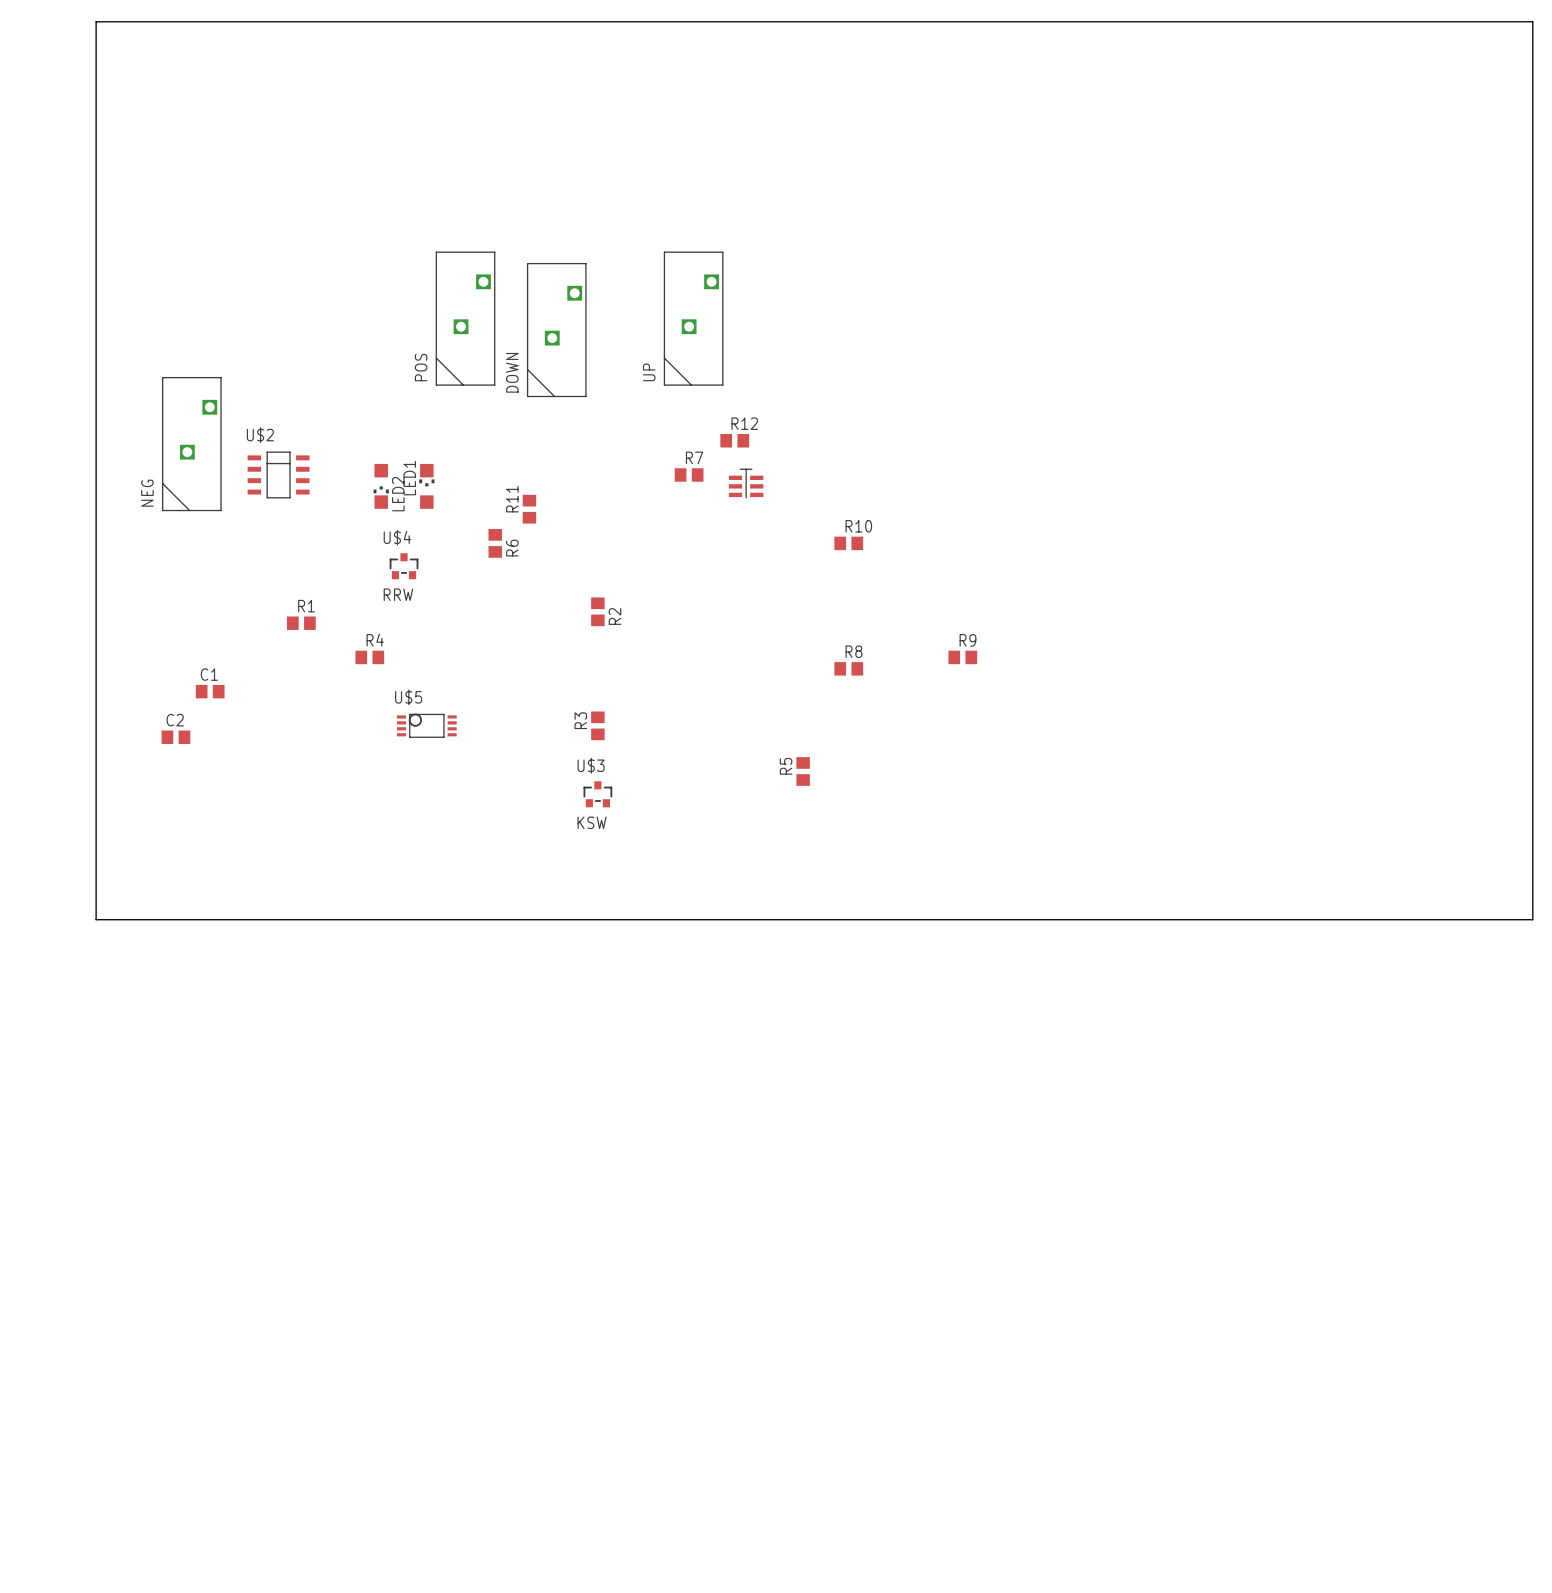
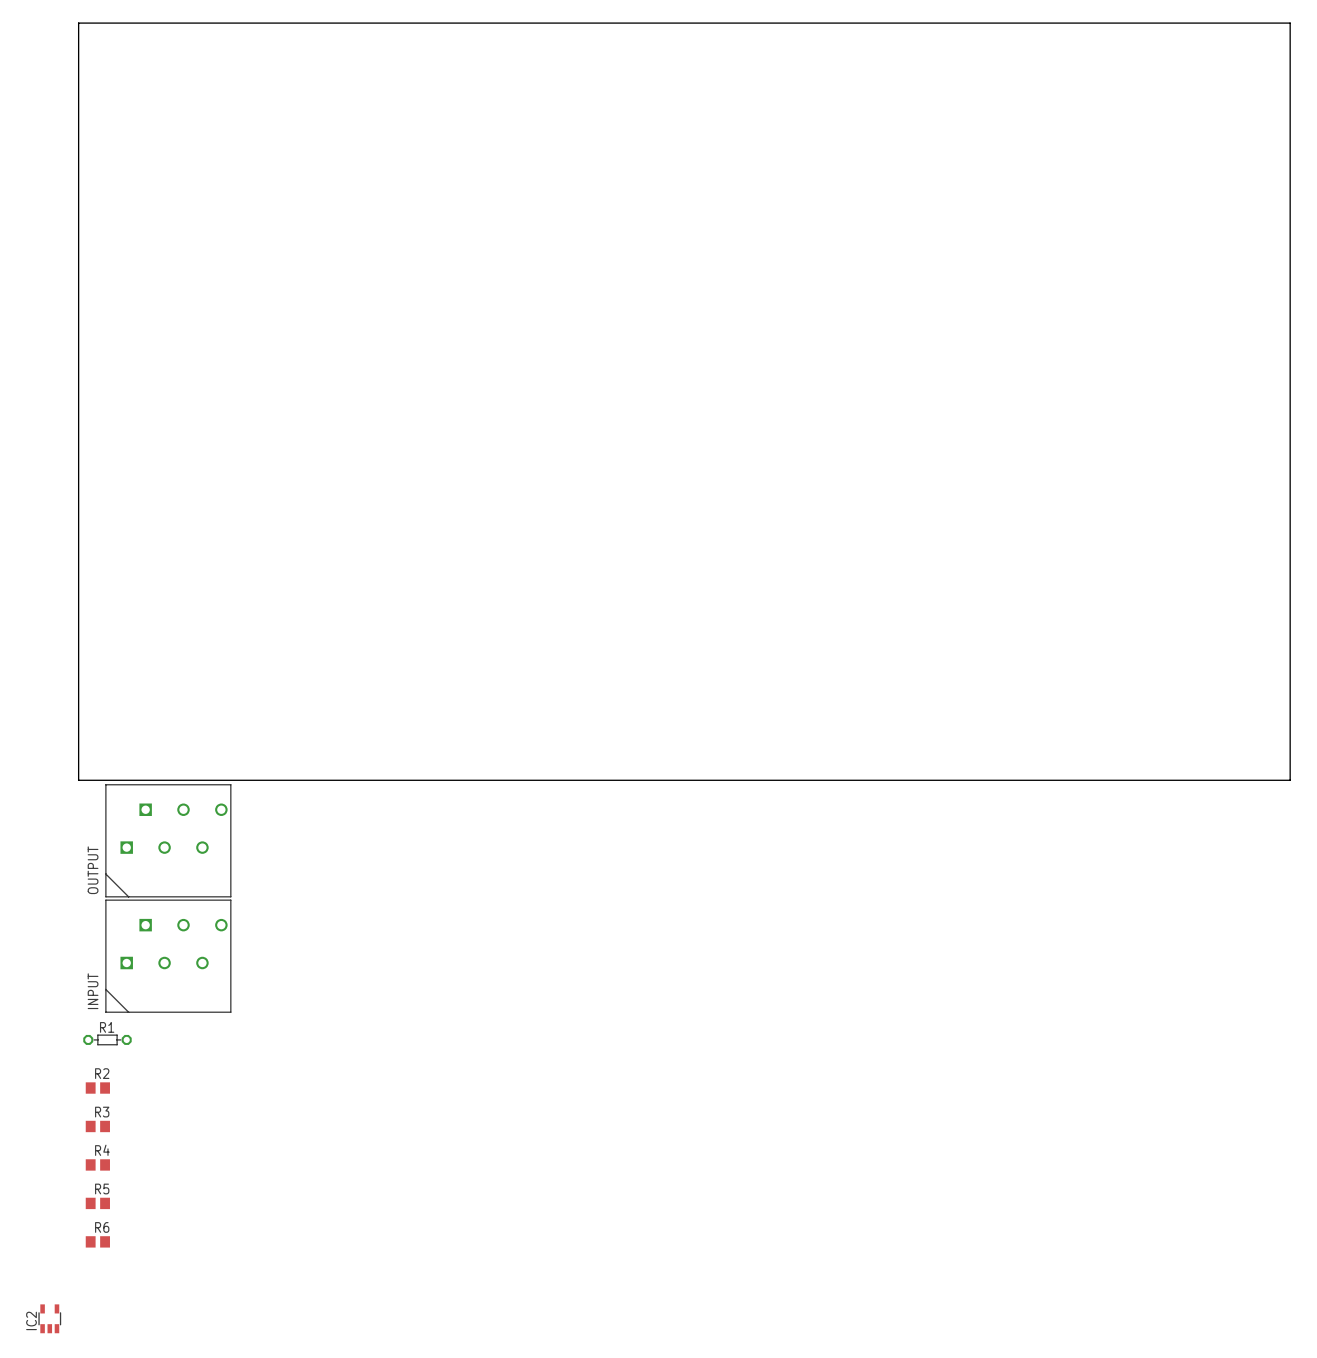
POS: (465, 318) -> none
UP: (693, 318) -> none
DOWN: (556, 330) -> none
R12: (734, 440) -> none
NEG: (191, 444) -> none
U$2: (278, 474) -> none
R7: (689, 474) -> none
part: (746, 483) -> none
LED2: (381, 486) -> none
LED1: (426, 486) -> none
R11: (529, 509) -> none
R6 rotation: 0° (495, 543) -> 90° clockwise (97, 1241)
R6 position: (495, 543) -> (97, 1241)
R10: (848, 543) -> none
R6 name position: R6 (512, 548) -> R6 (102, 1227)
U$4: RRW (404, 566) -> none
R2 rotation: 0° (597, 611) -> 90° clockwise (97, 1088)
R2 position: (597, 611) -> (97, 1088)
R1 footprint: [287, 616, 316, 630] -> [83, 1034, 132, 1046]
R2 name position: R2 (614, 616) -> R2 (102, 1073)
R4 position: (369, 657) -> (97, 1164)
R9: (962, 657) -> none
R8: (848, 668) -> none
C1: (210, 691) -> none
U$5: (426, 725) -> none
R3 rotation: 0° (597, 725) -> 90° clockwise (97, 1126)
R3 position: (597, 725) -> (97, 1126)
C2: (175, 737) -> none
R5 rotation: 0° (803, 771) -> 90° clockwise (97, 1203)
R5 position: (803, 771) -> (97, 1203)
U$3: KSW (597, 794) -> none
OUTPUT: none -> (168, 840)
INPUT: none -> (168, 956)
IC2: none -> (49, 1318)

